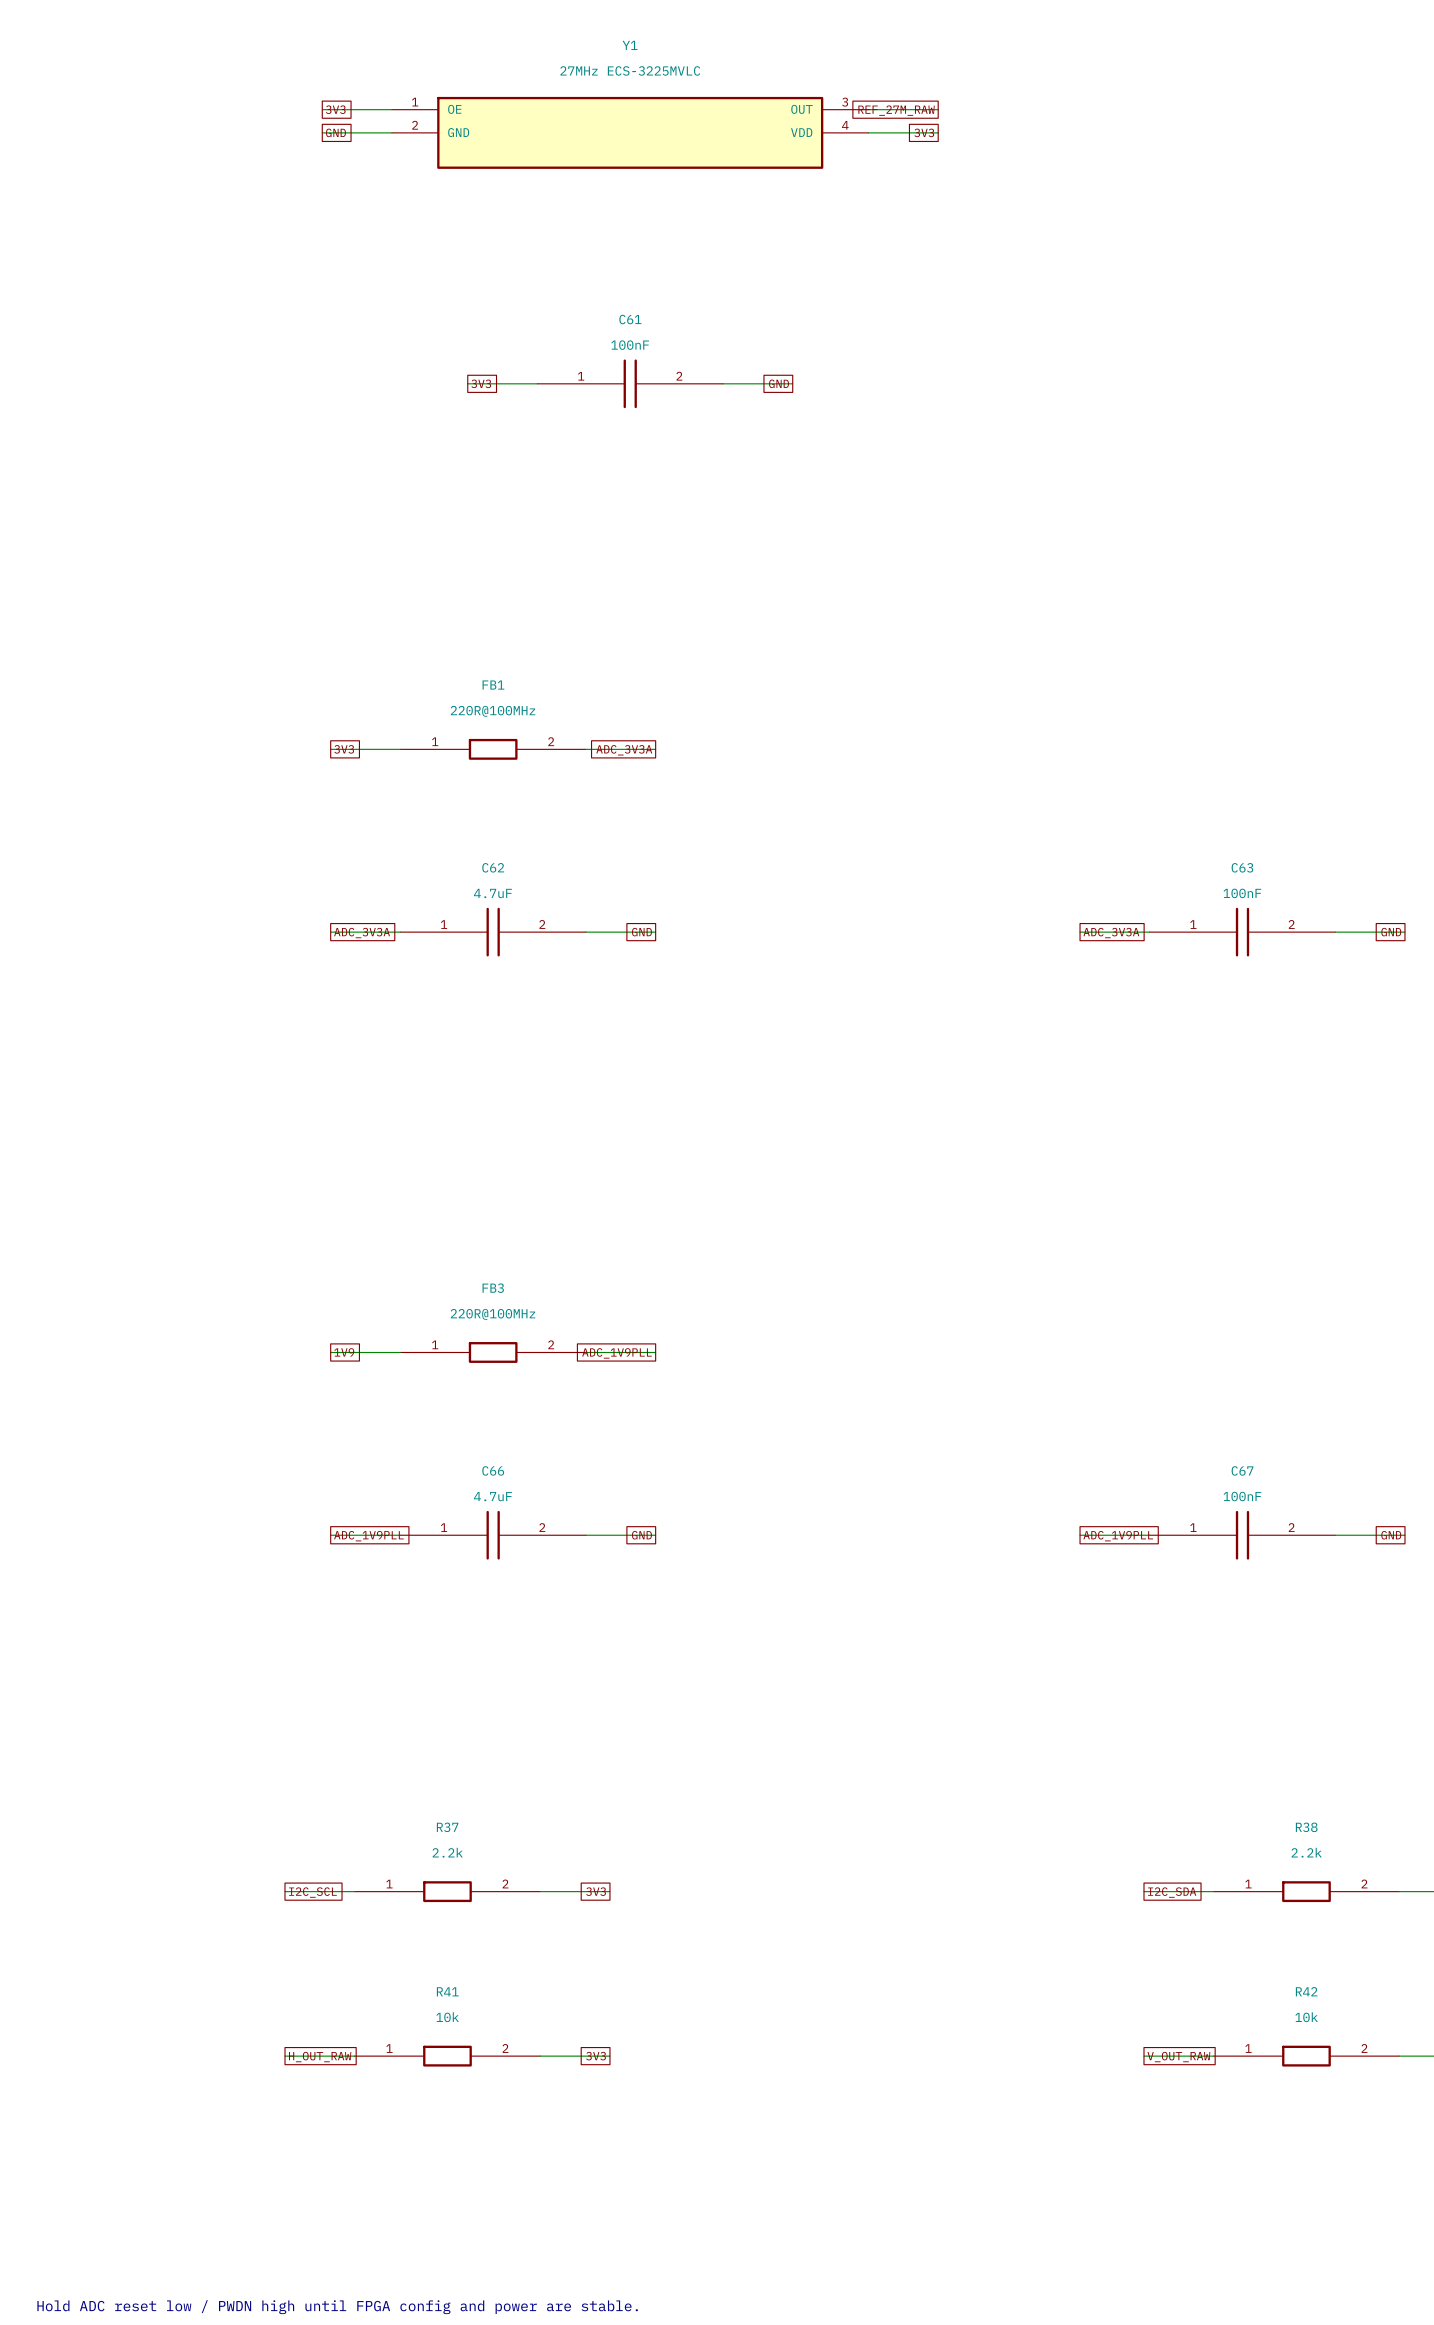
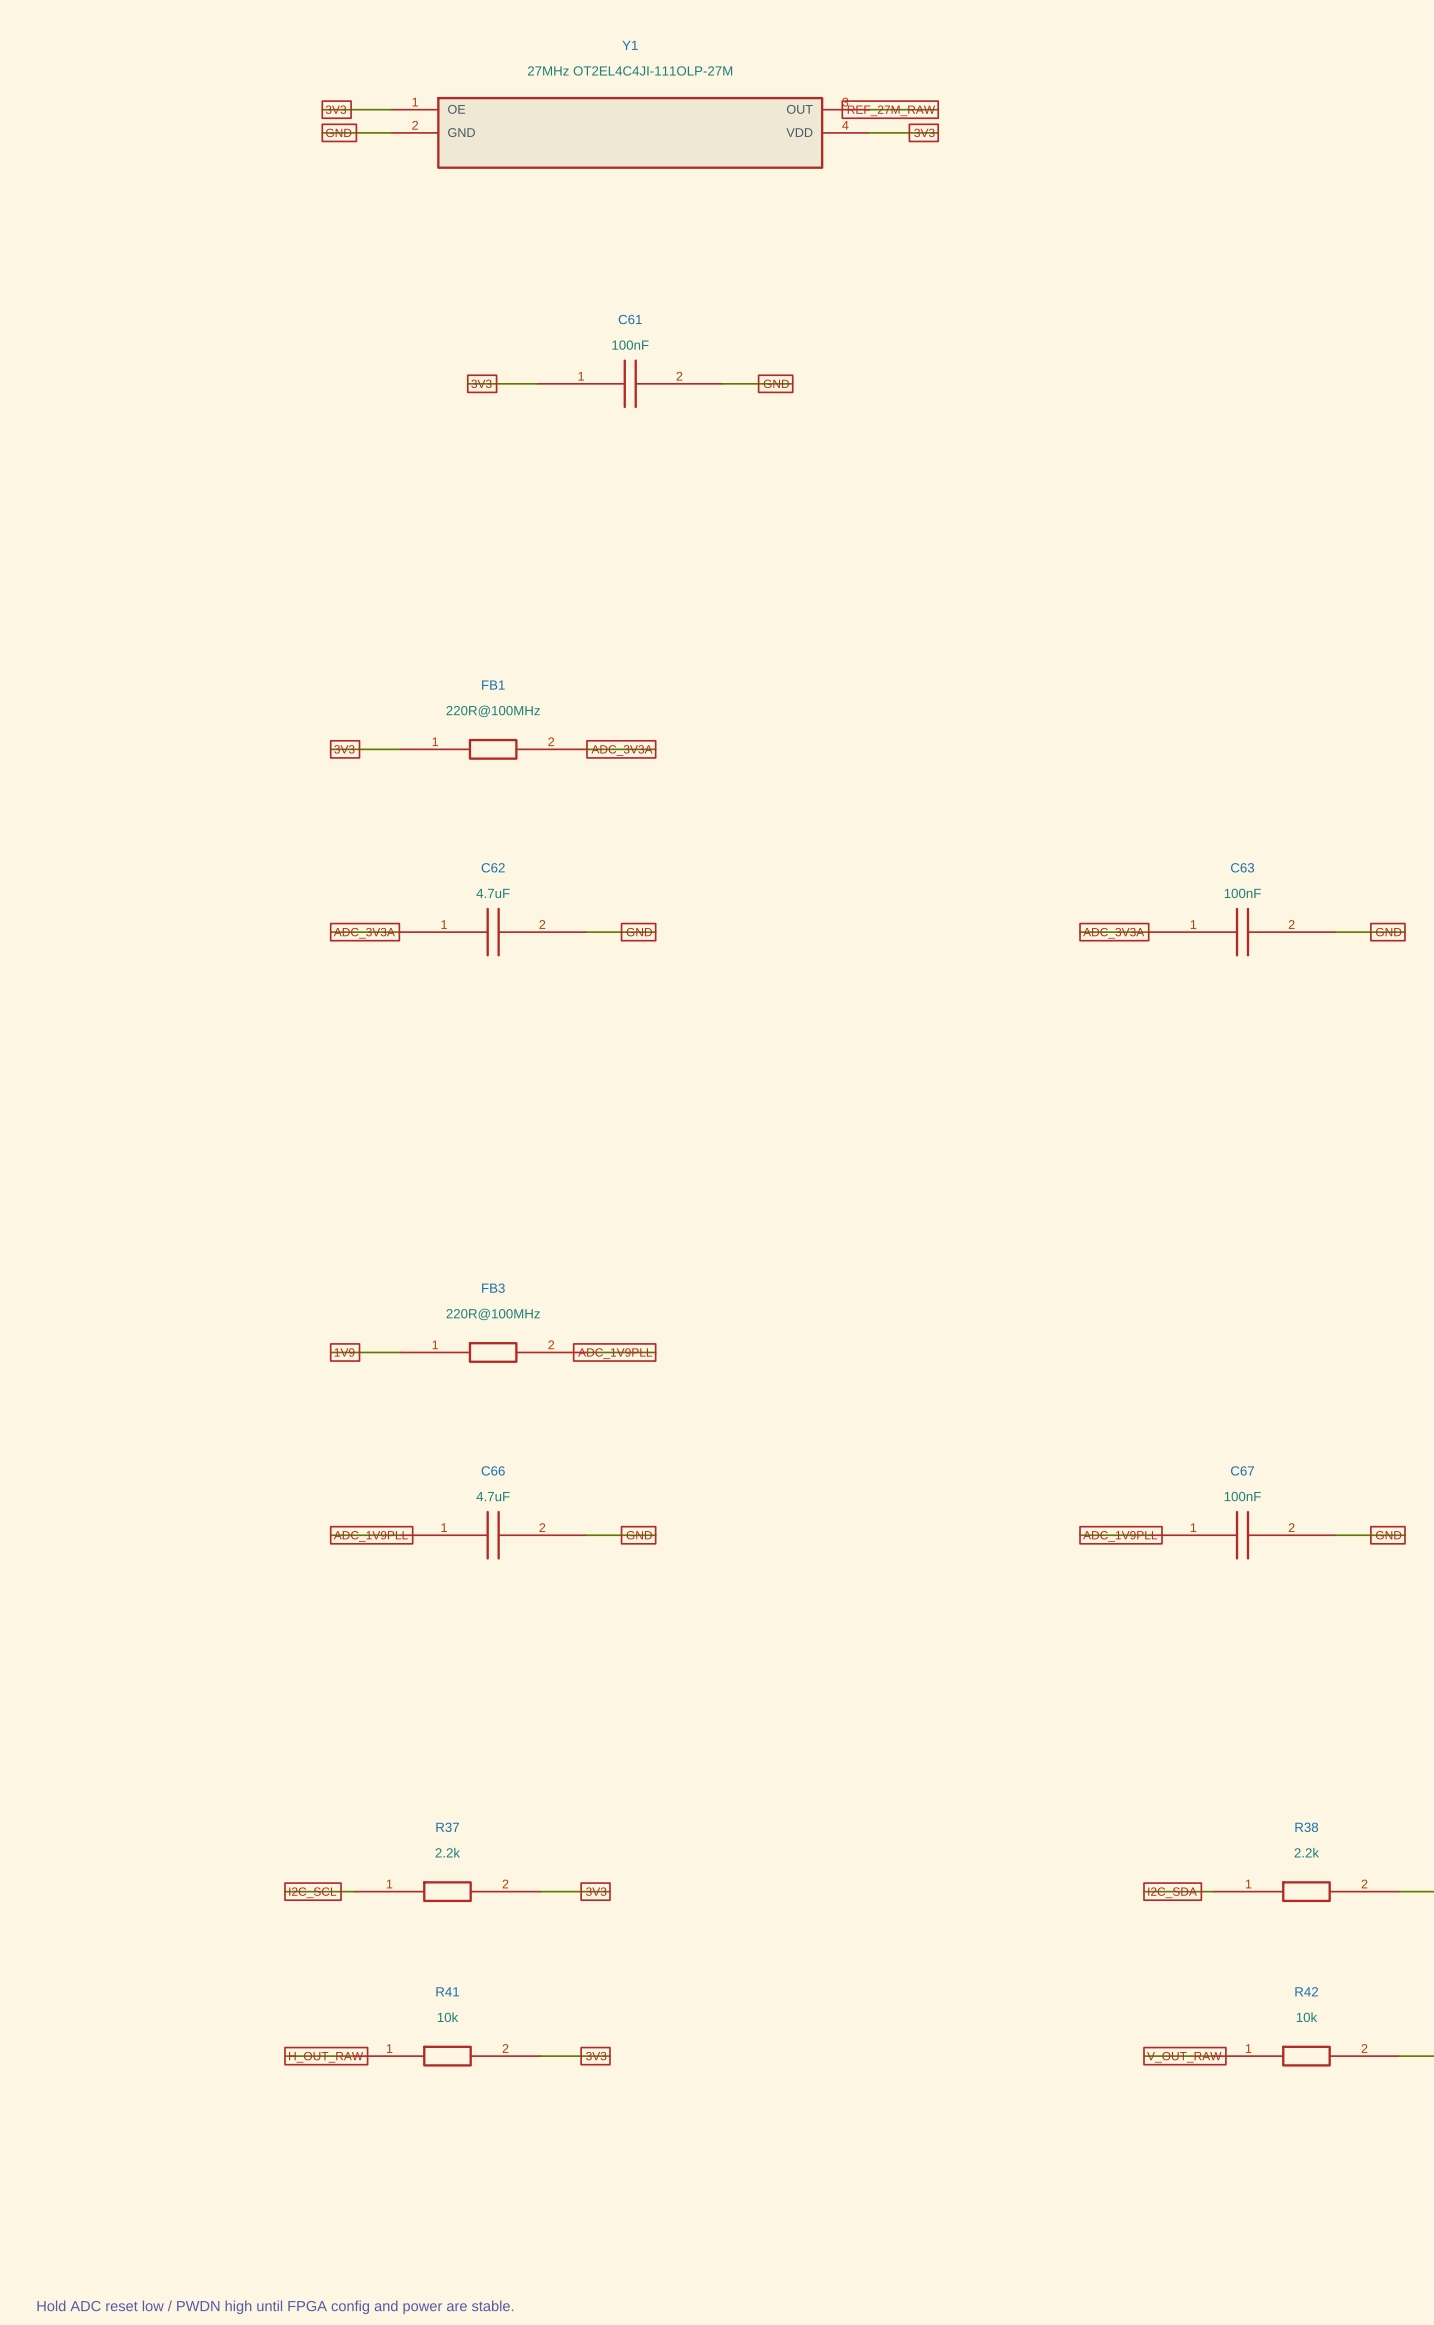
Y1 value: 27MHz ECS-3225MVLC (630, 70) -> 27MHz OT2EL4C4JI-111OLP-27M (630, 70)

